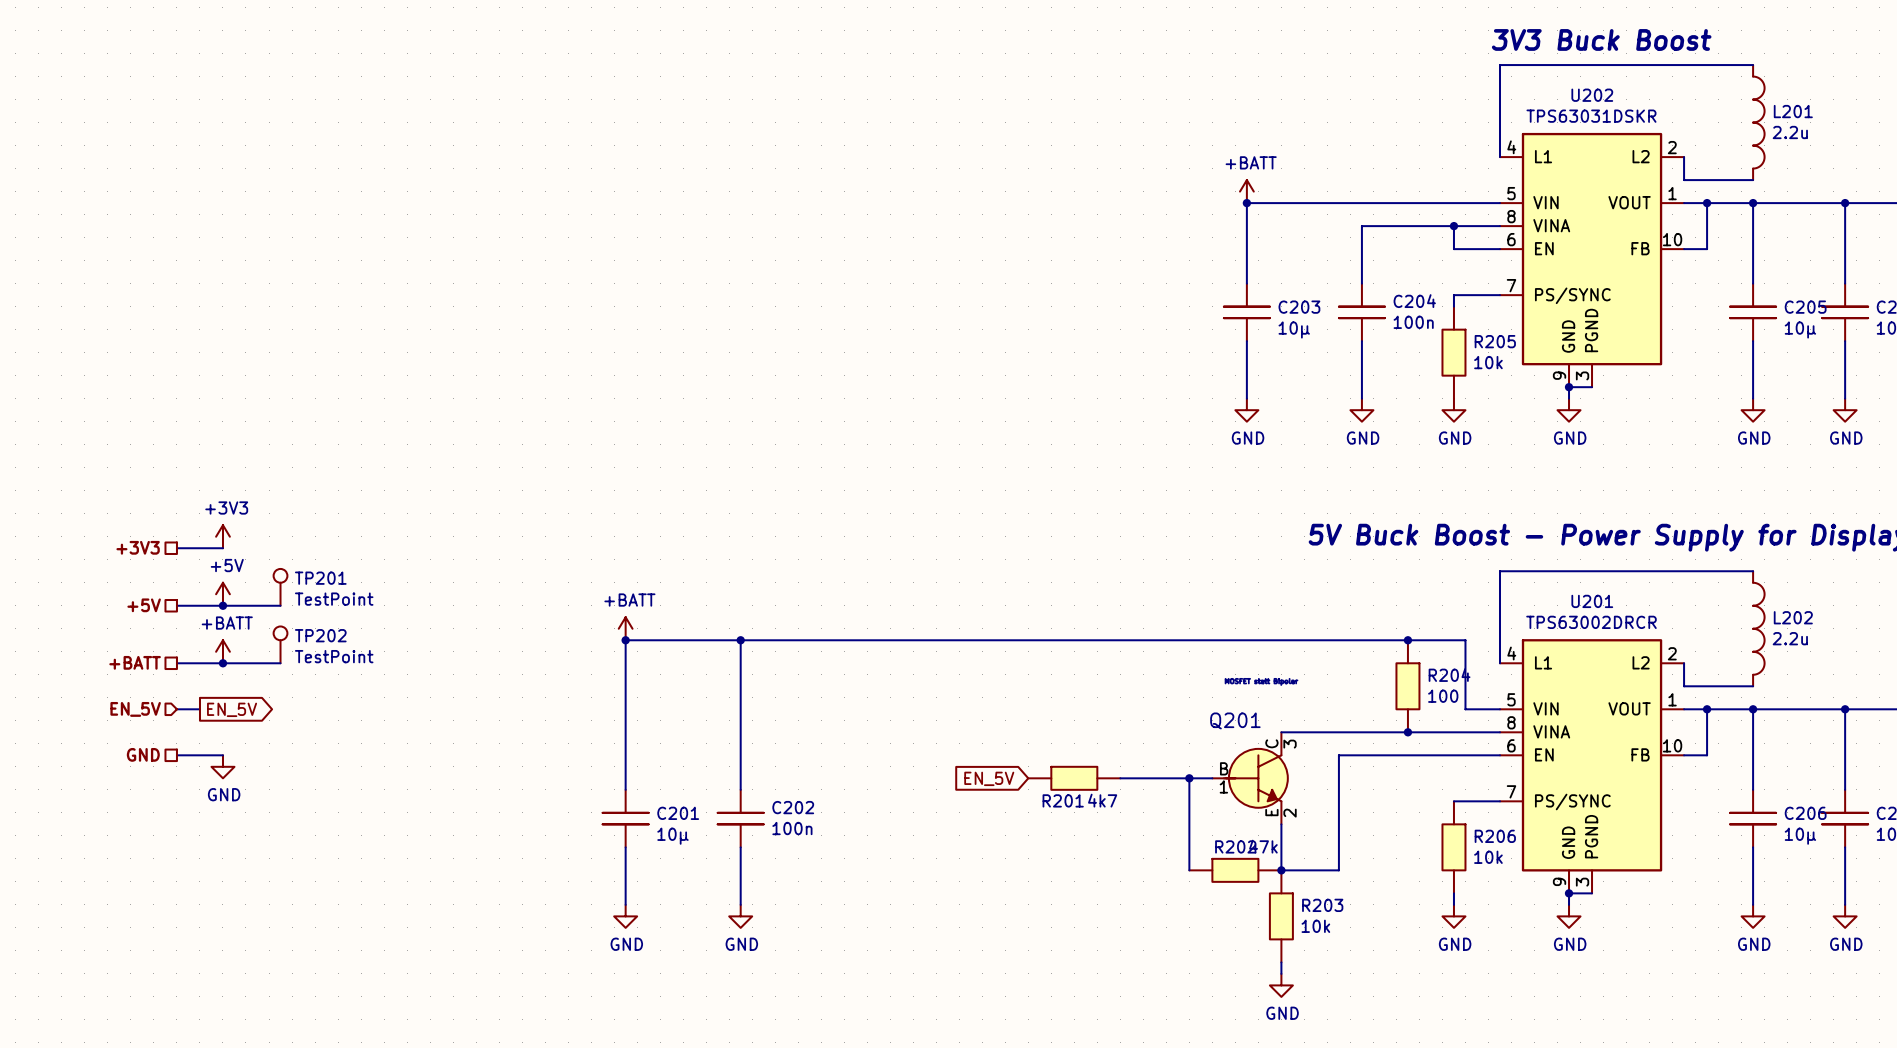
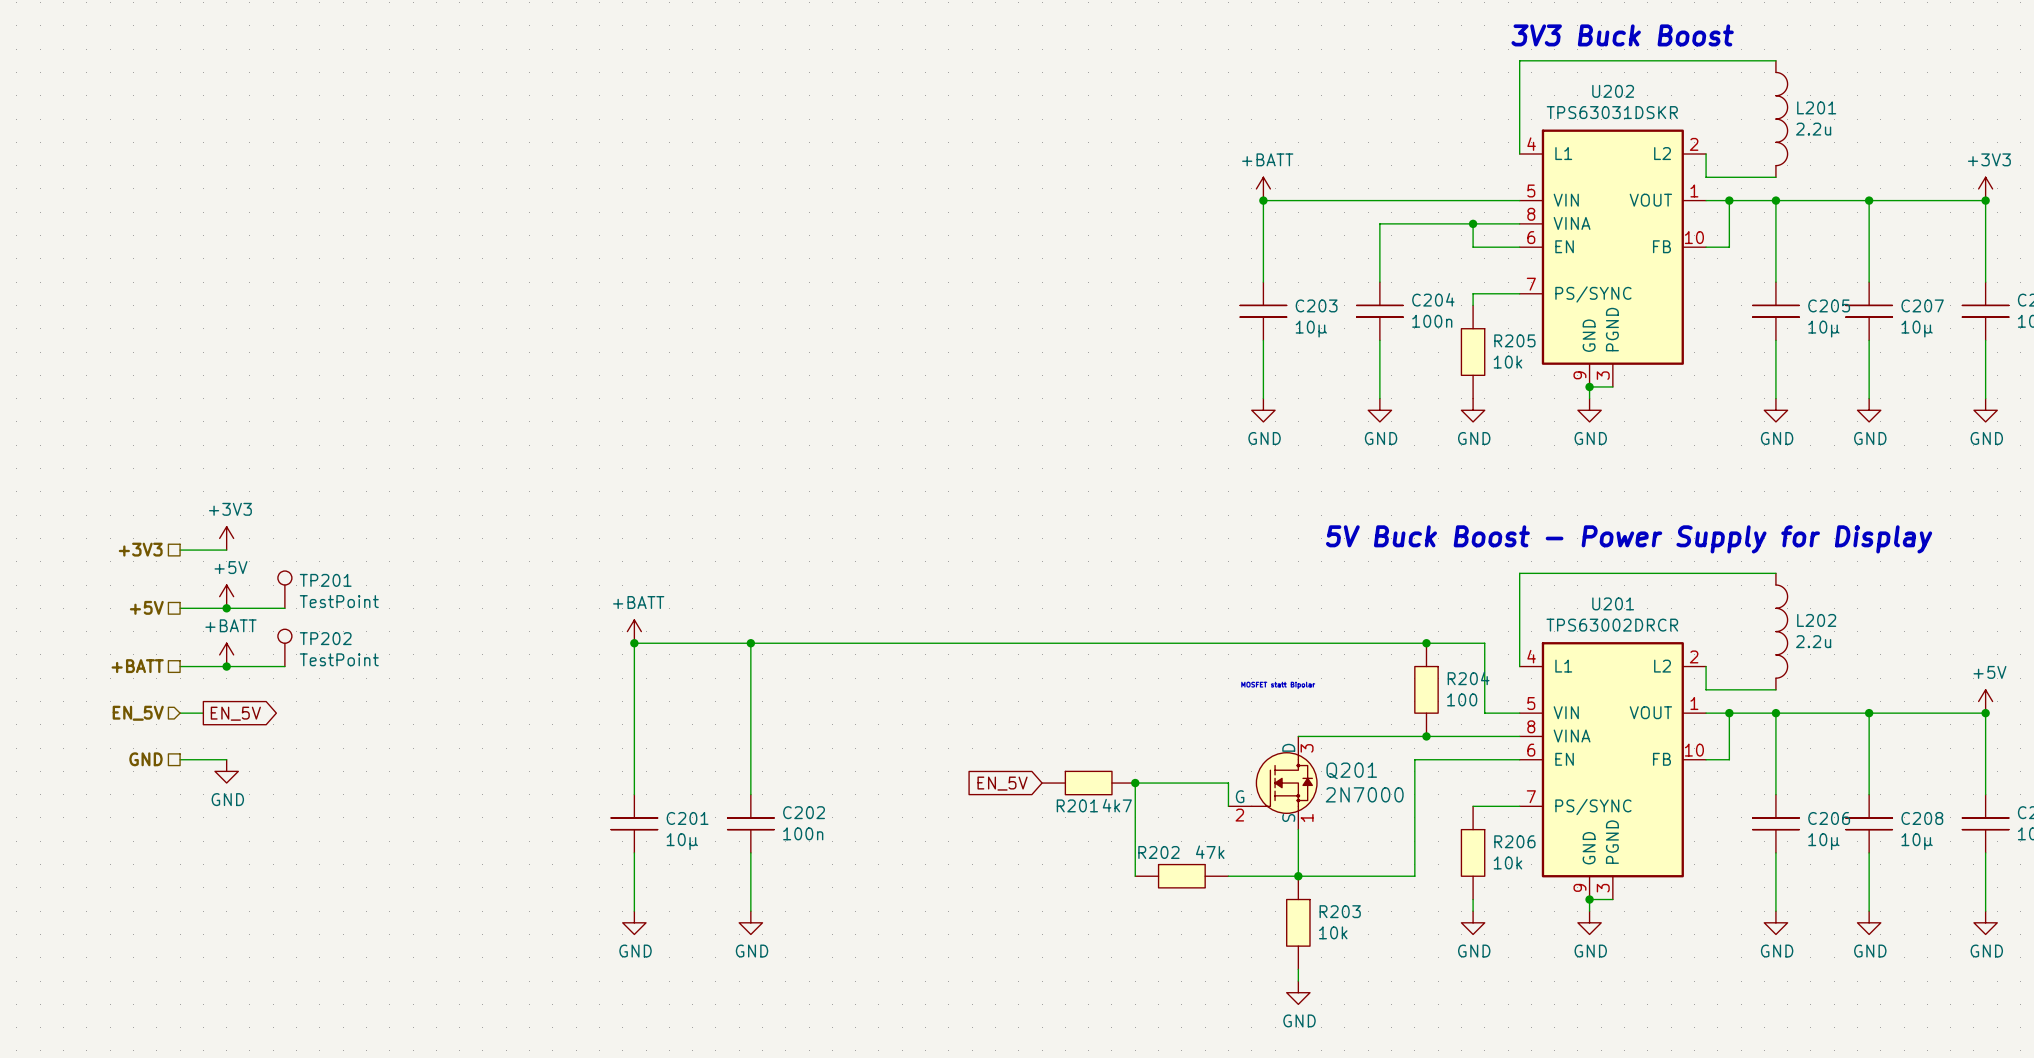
Q201 name position: Q201 (1235, 720) -> Q201 (1351, 770)
Q201 symbol: [1212, 732, 1288, 825] -> [1228, 736, 1317, 830]
wire: (1396, 755) (1338, 755) (1338, 870) -> (1414, 759) (1414, 876) (1356, 876)
junction: none -> (1135, 783)
wire: (1189, 778) (1189, 870) -> (1135, 783) (1135, 876)
junction: (1189, 778) -> none
wire: none -> (1228, 783) (1228, 806)
Q201 value: none -> 2N7000 (1364, 794)
R202 name position: R202 (1235, 846) -> R202 (1158, 852)
R202 position: (1235, 870) -> (1181, 876)

